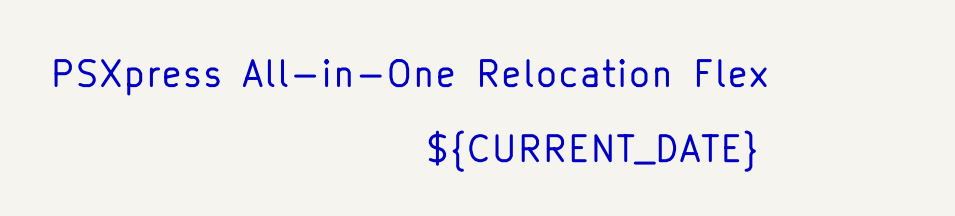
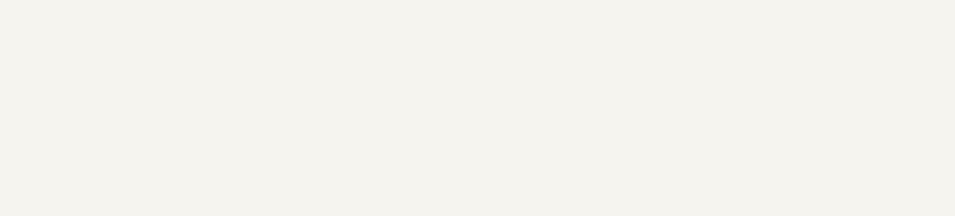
text: PSXpress All-in-One Relocation Flex (410, 77) -> none
text: ${CURRENT_DATE} (592, 151) -> none

